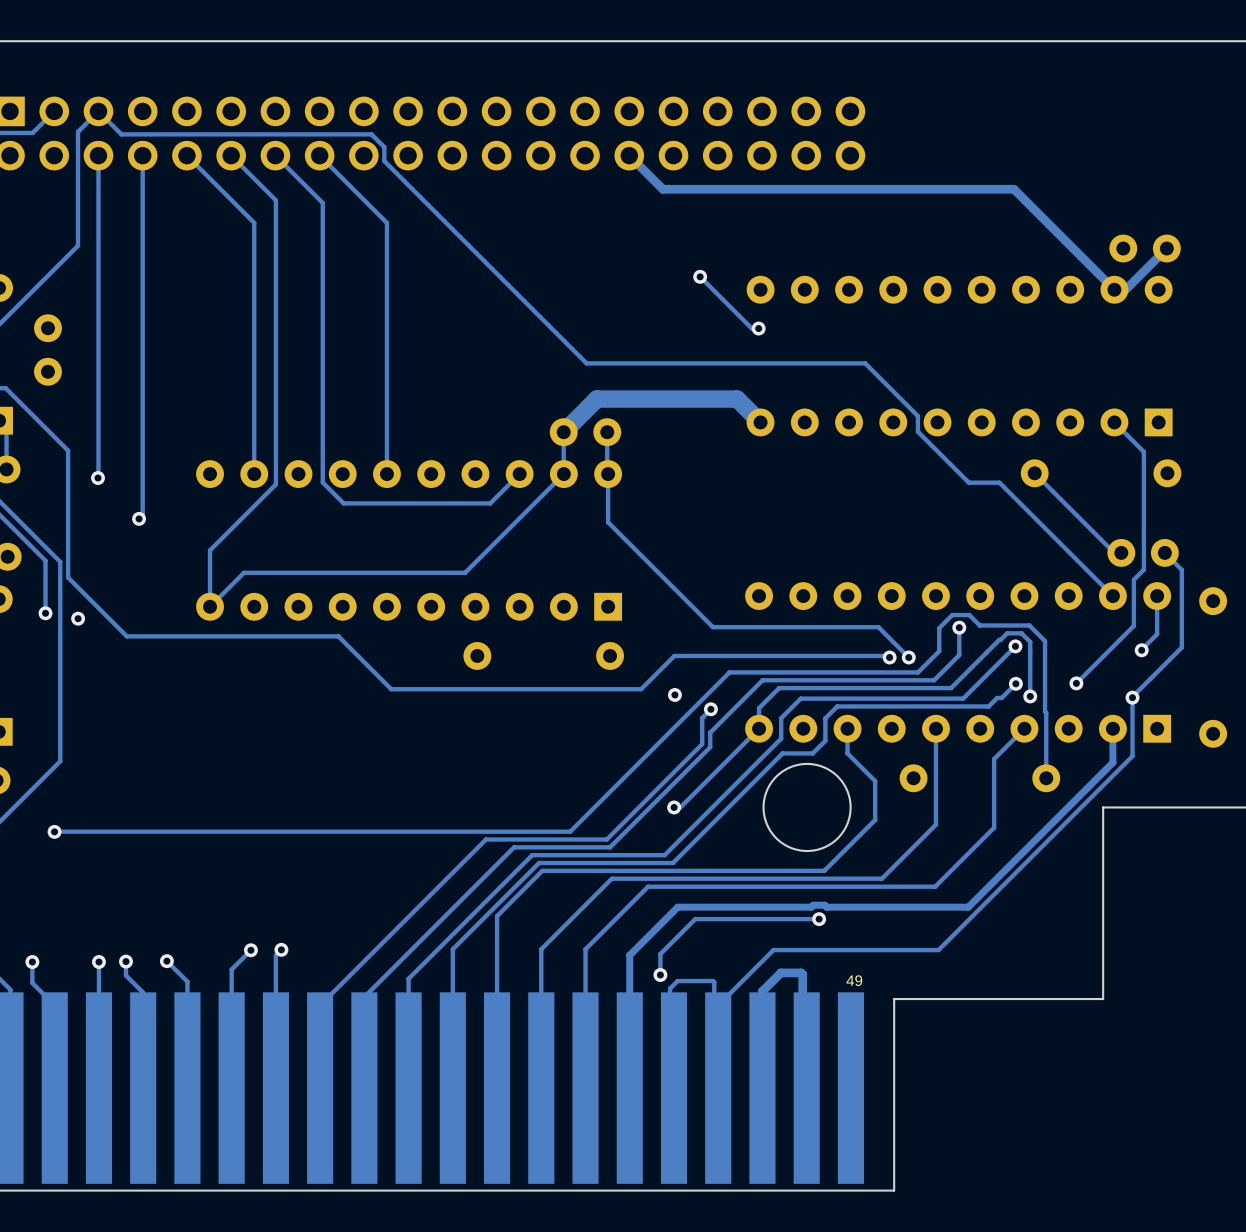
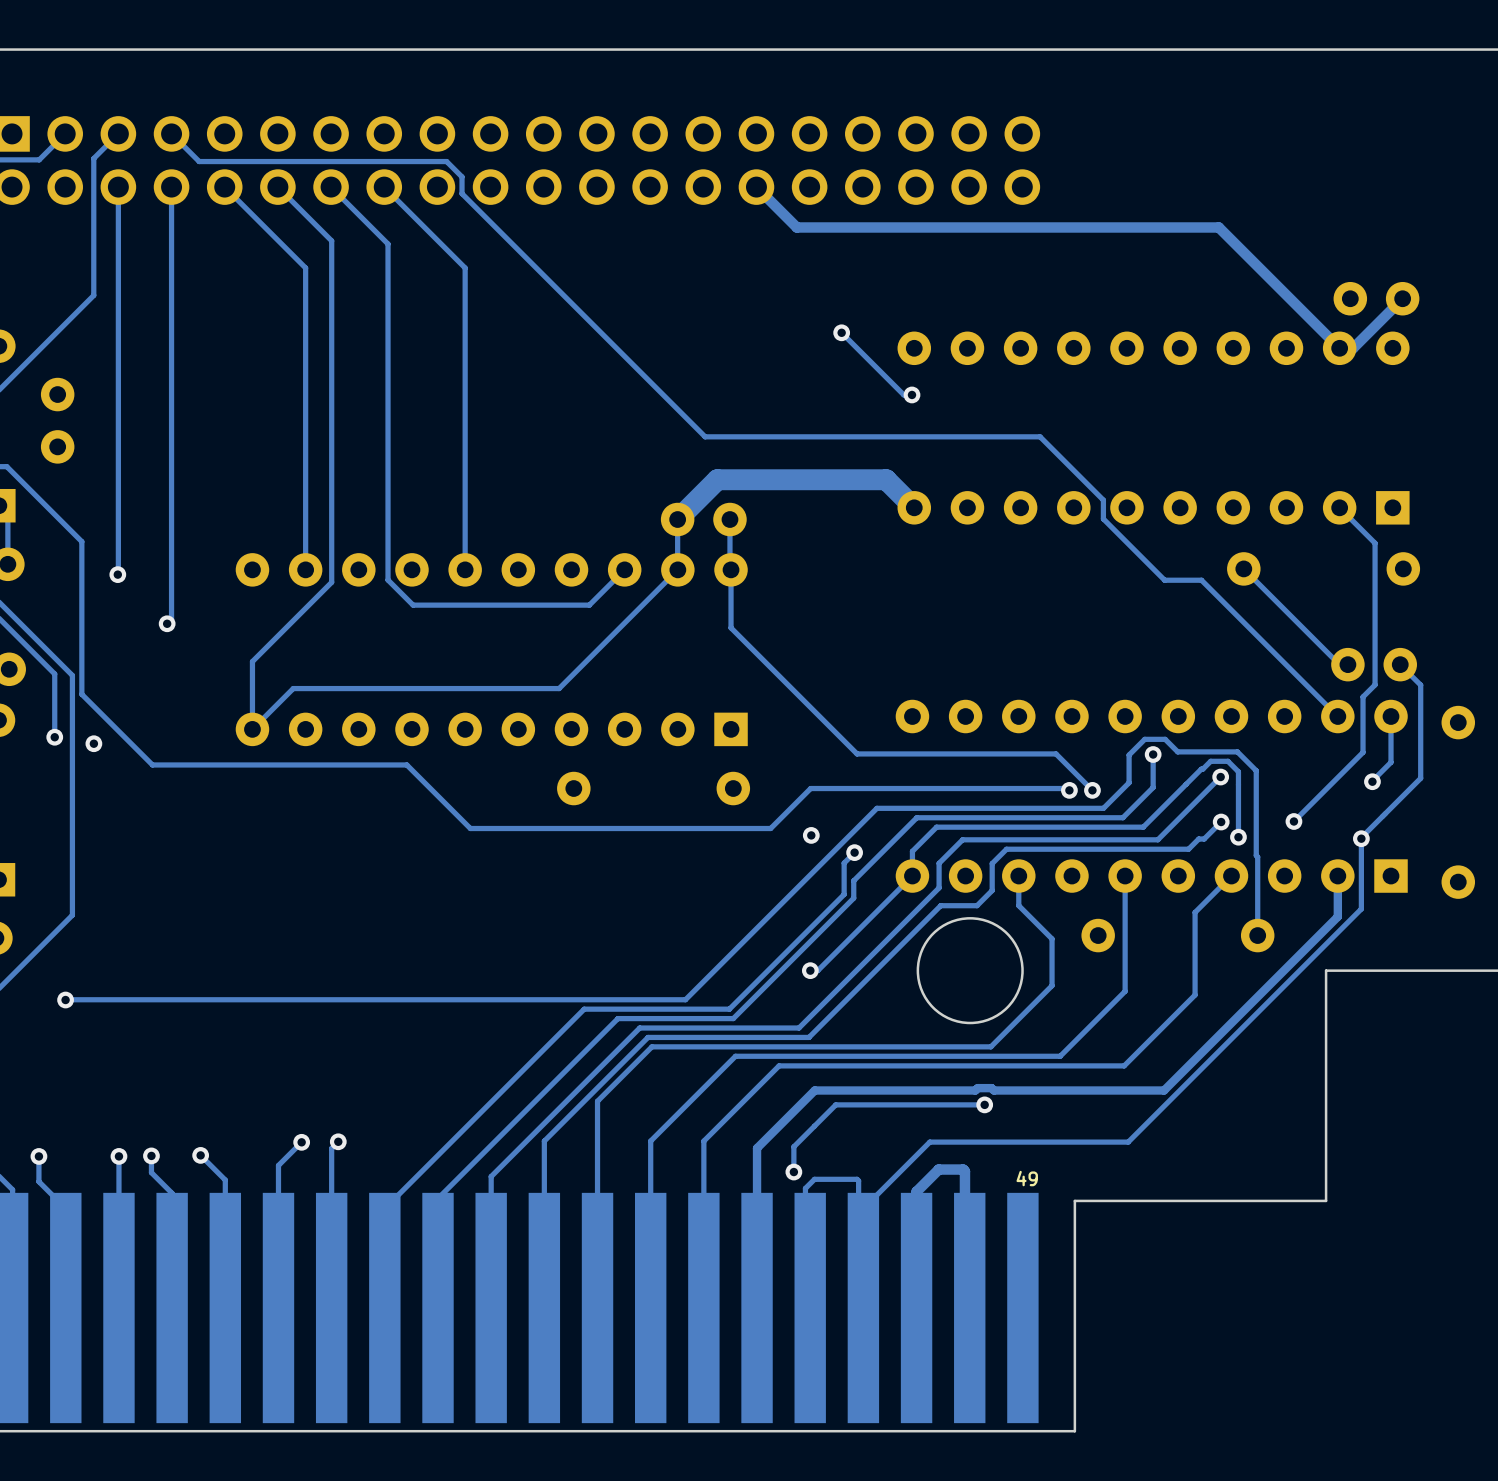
track: (98, 111) (121, 134) (165, 134) -> (171, 133) (199, 161)

